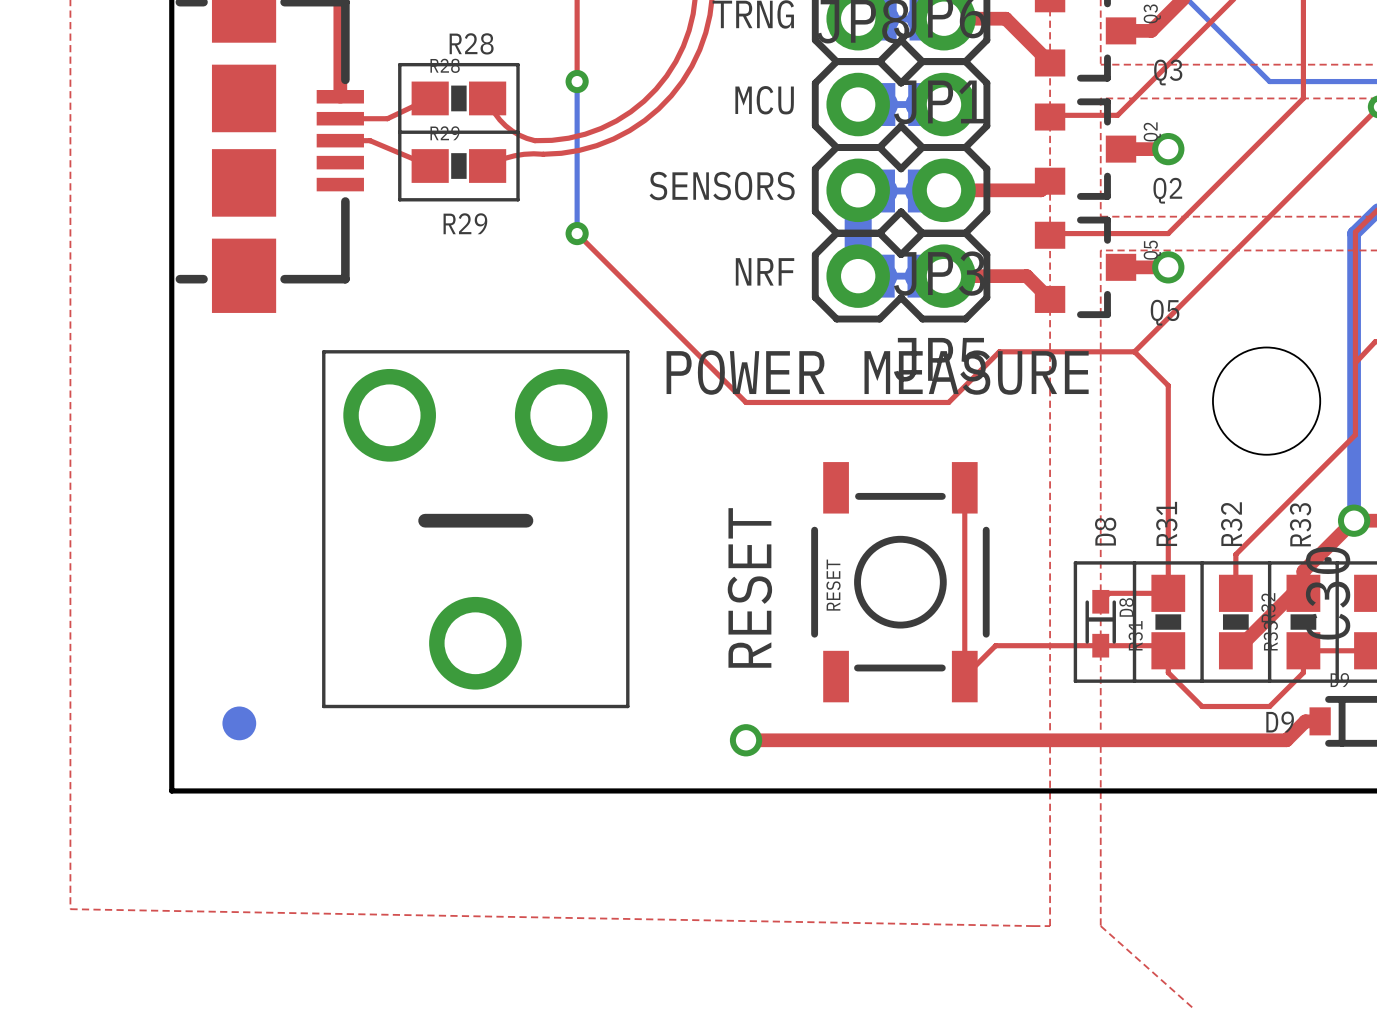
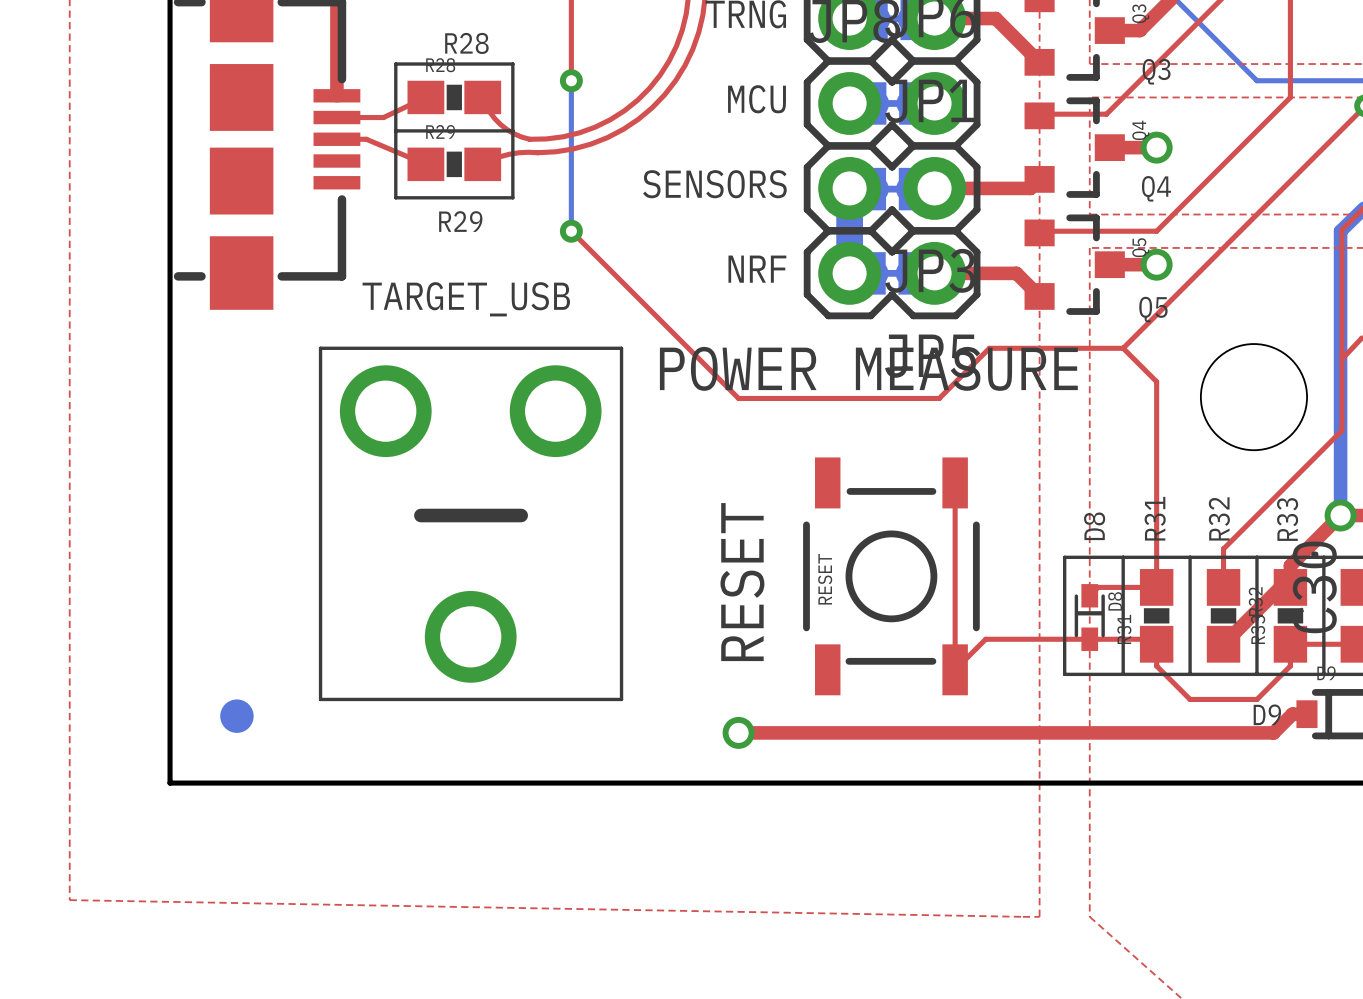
Q2 name: Q2 (1152, 131) -> Q4 (1140, 130)
text: Q2 (1167, 190) -> Q4 (1156, 188)
text: none -> TARGET_USB (466, 299)

